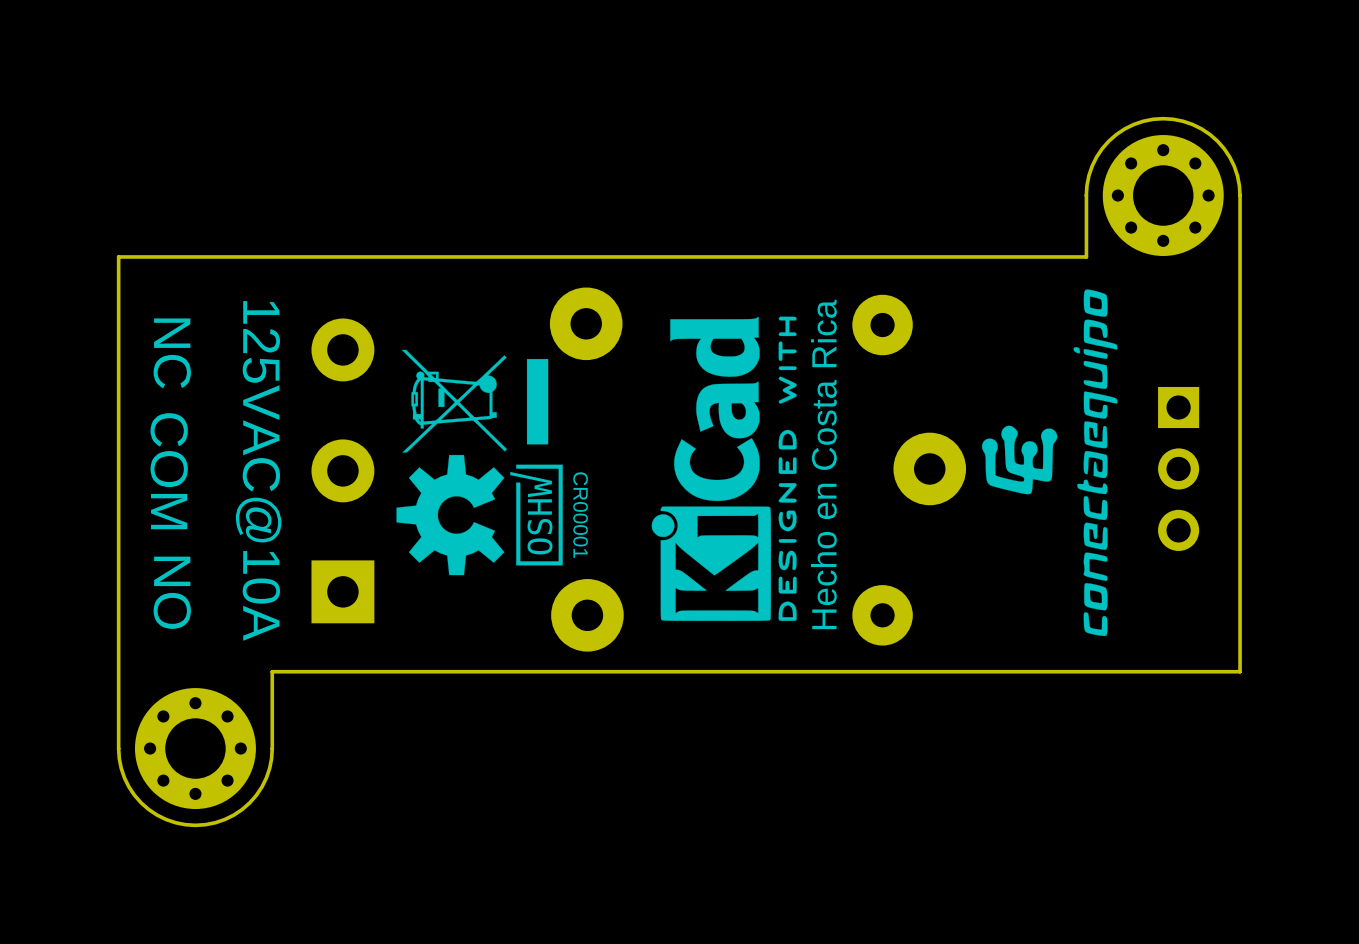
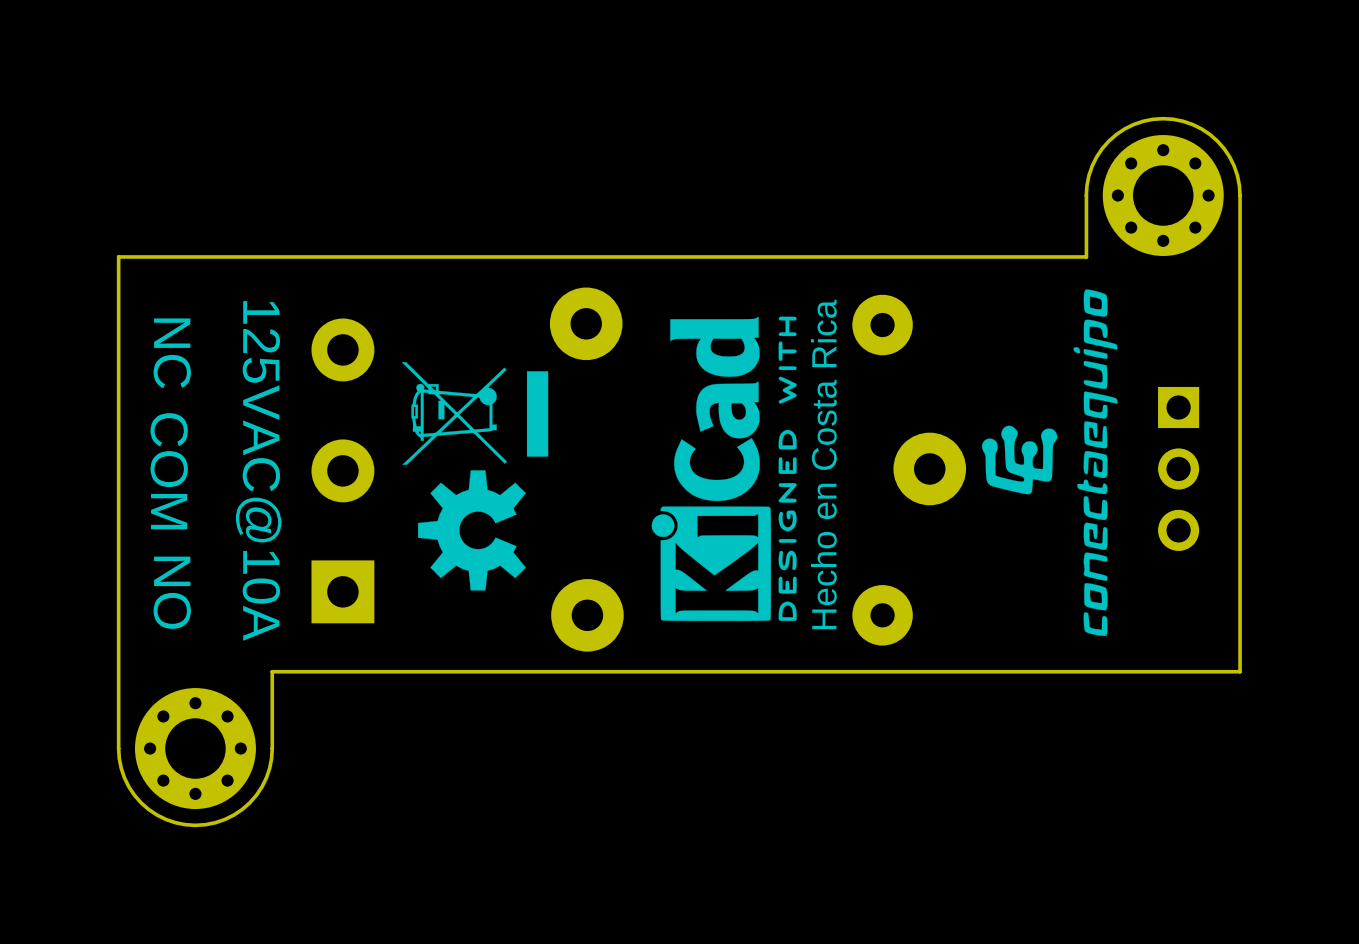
drawing position: (474, 401) -> (474, 413)
drawing: [510, 464, 563, 566] -> none
drawing position: (450, 515) -> (471, 530)

